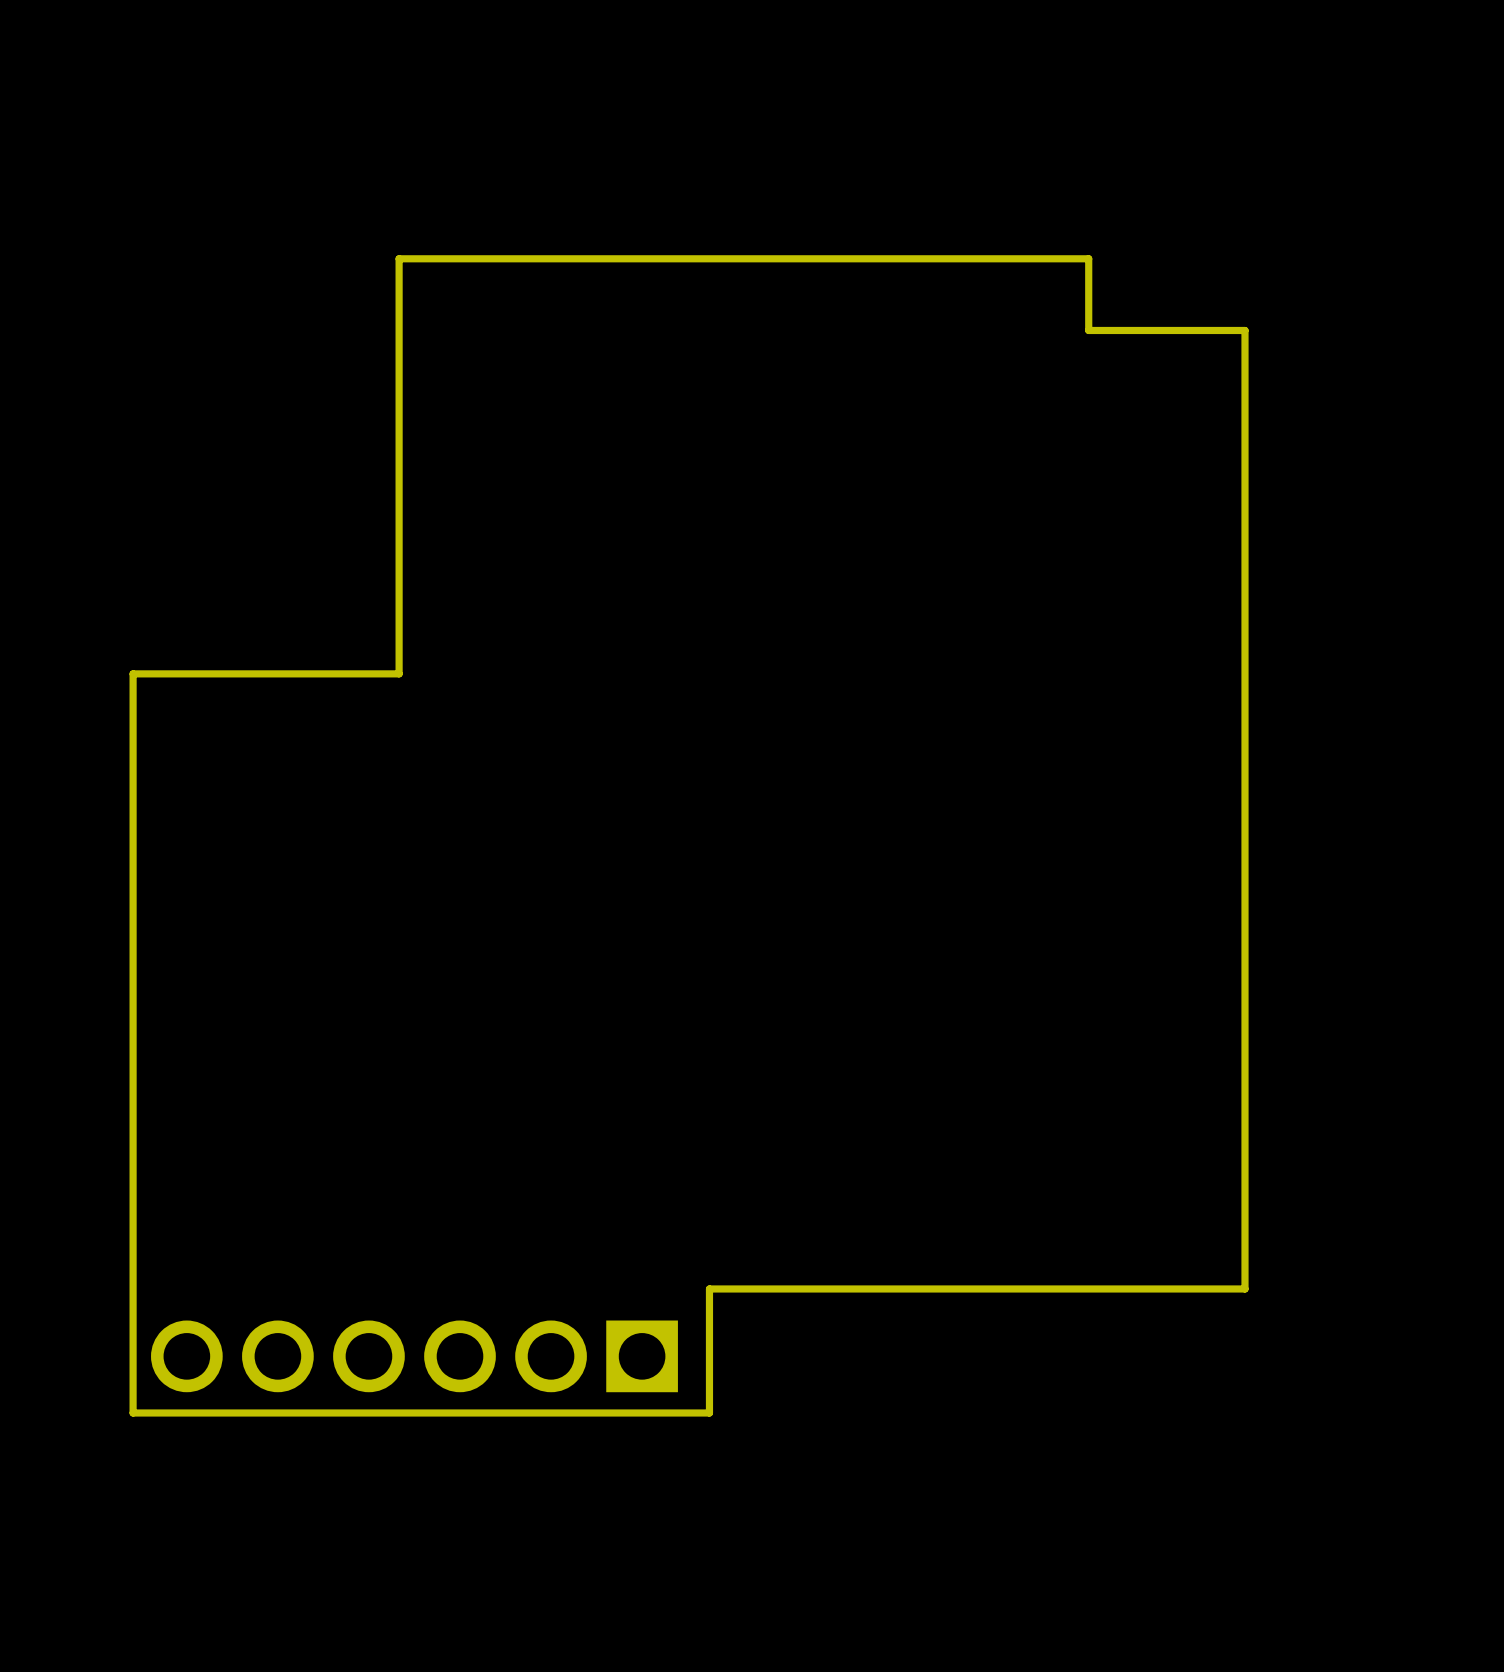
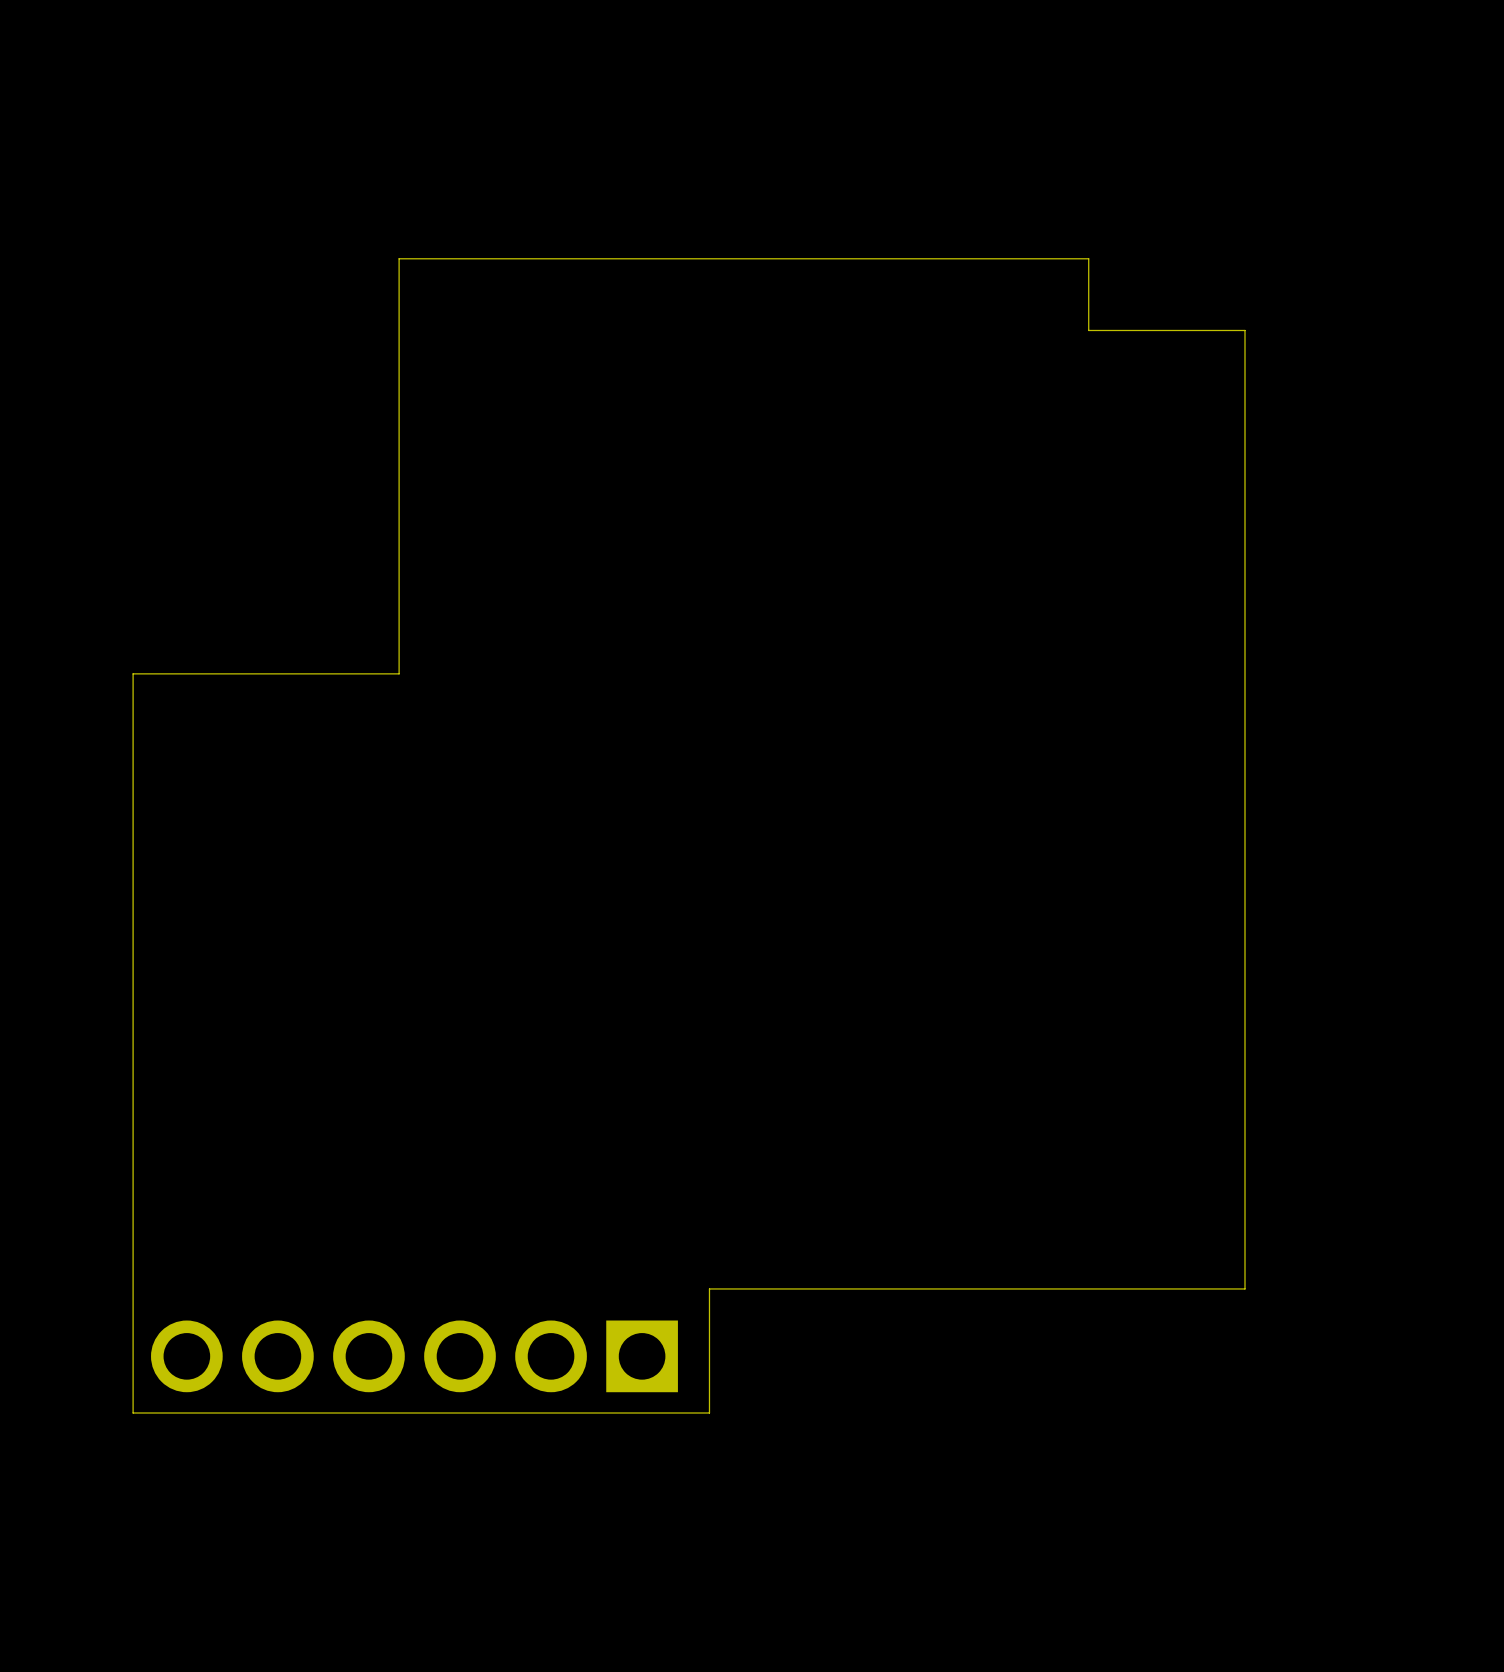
board edge width: thick (399, 258) (1088, 258) (1088, 330) (1245, 330) (1245, 1288) (709, 1288) (709, 1413) (133, 1413) (133, 673) (399, 673) (399, 258) -> thin (399, 258) (1088, 258) (1088, 330) (1245, 330) (1245, 1288) (709, 1288) (709, 1413) (133, 1413) (133, 673) (399, 673) (399, 258)

